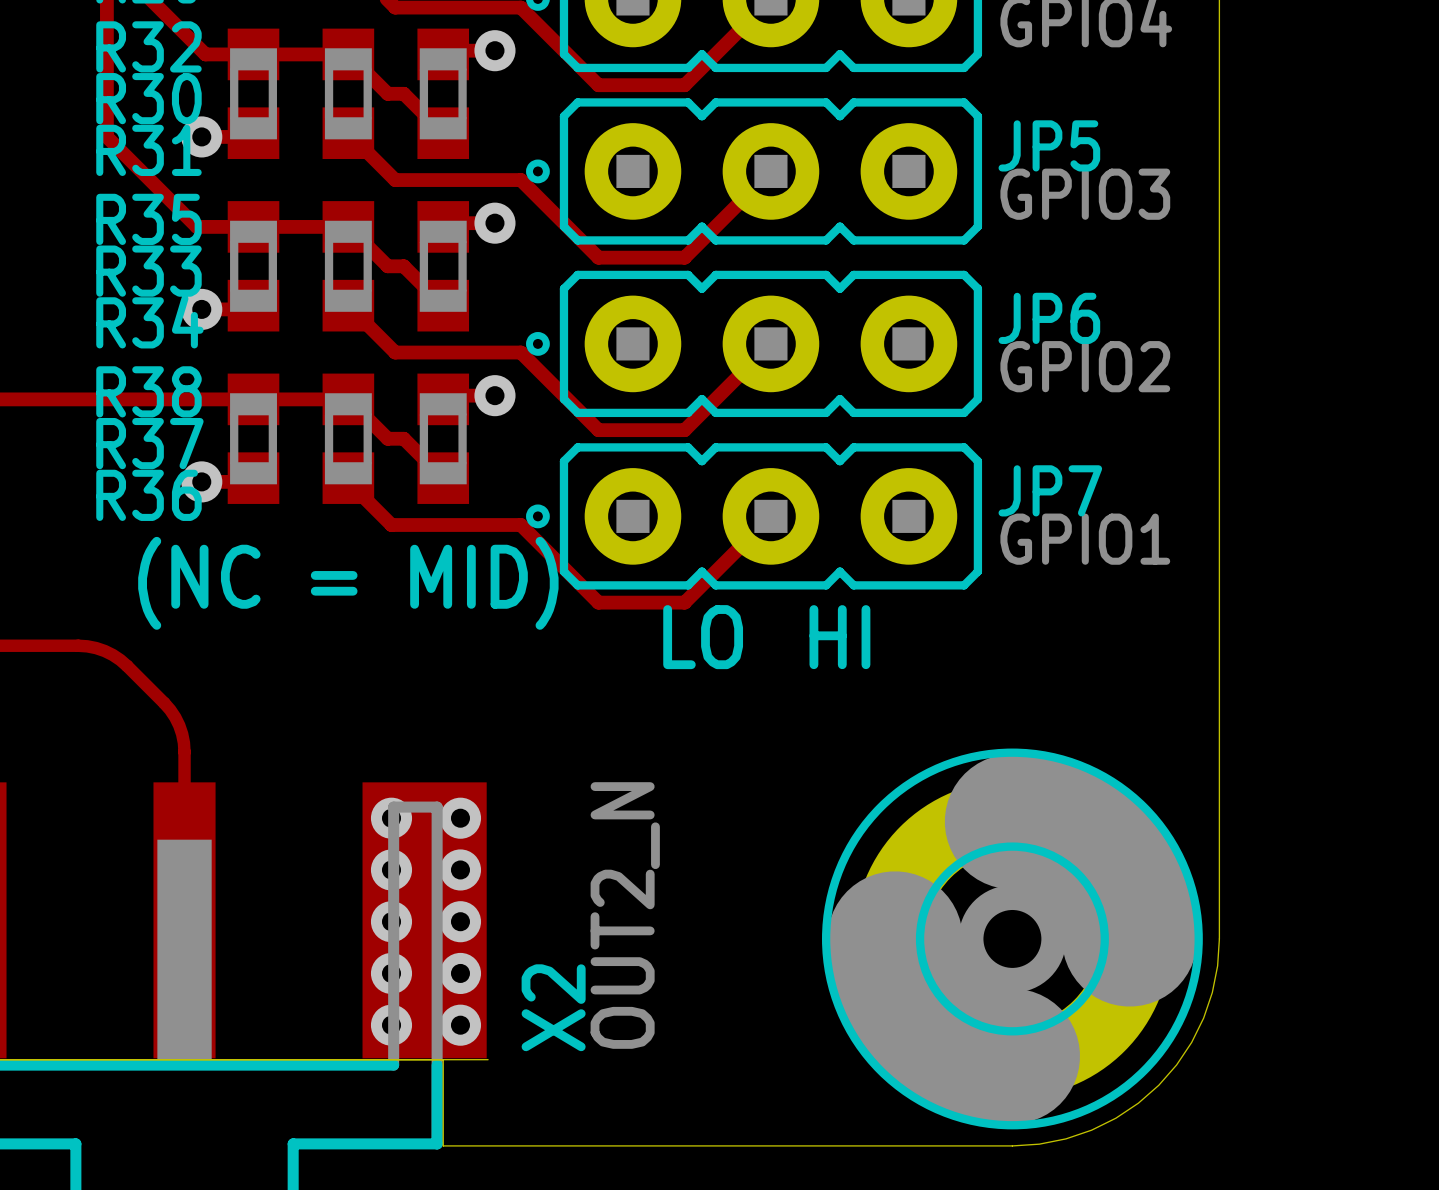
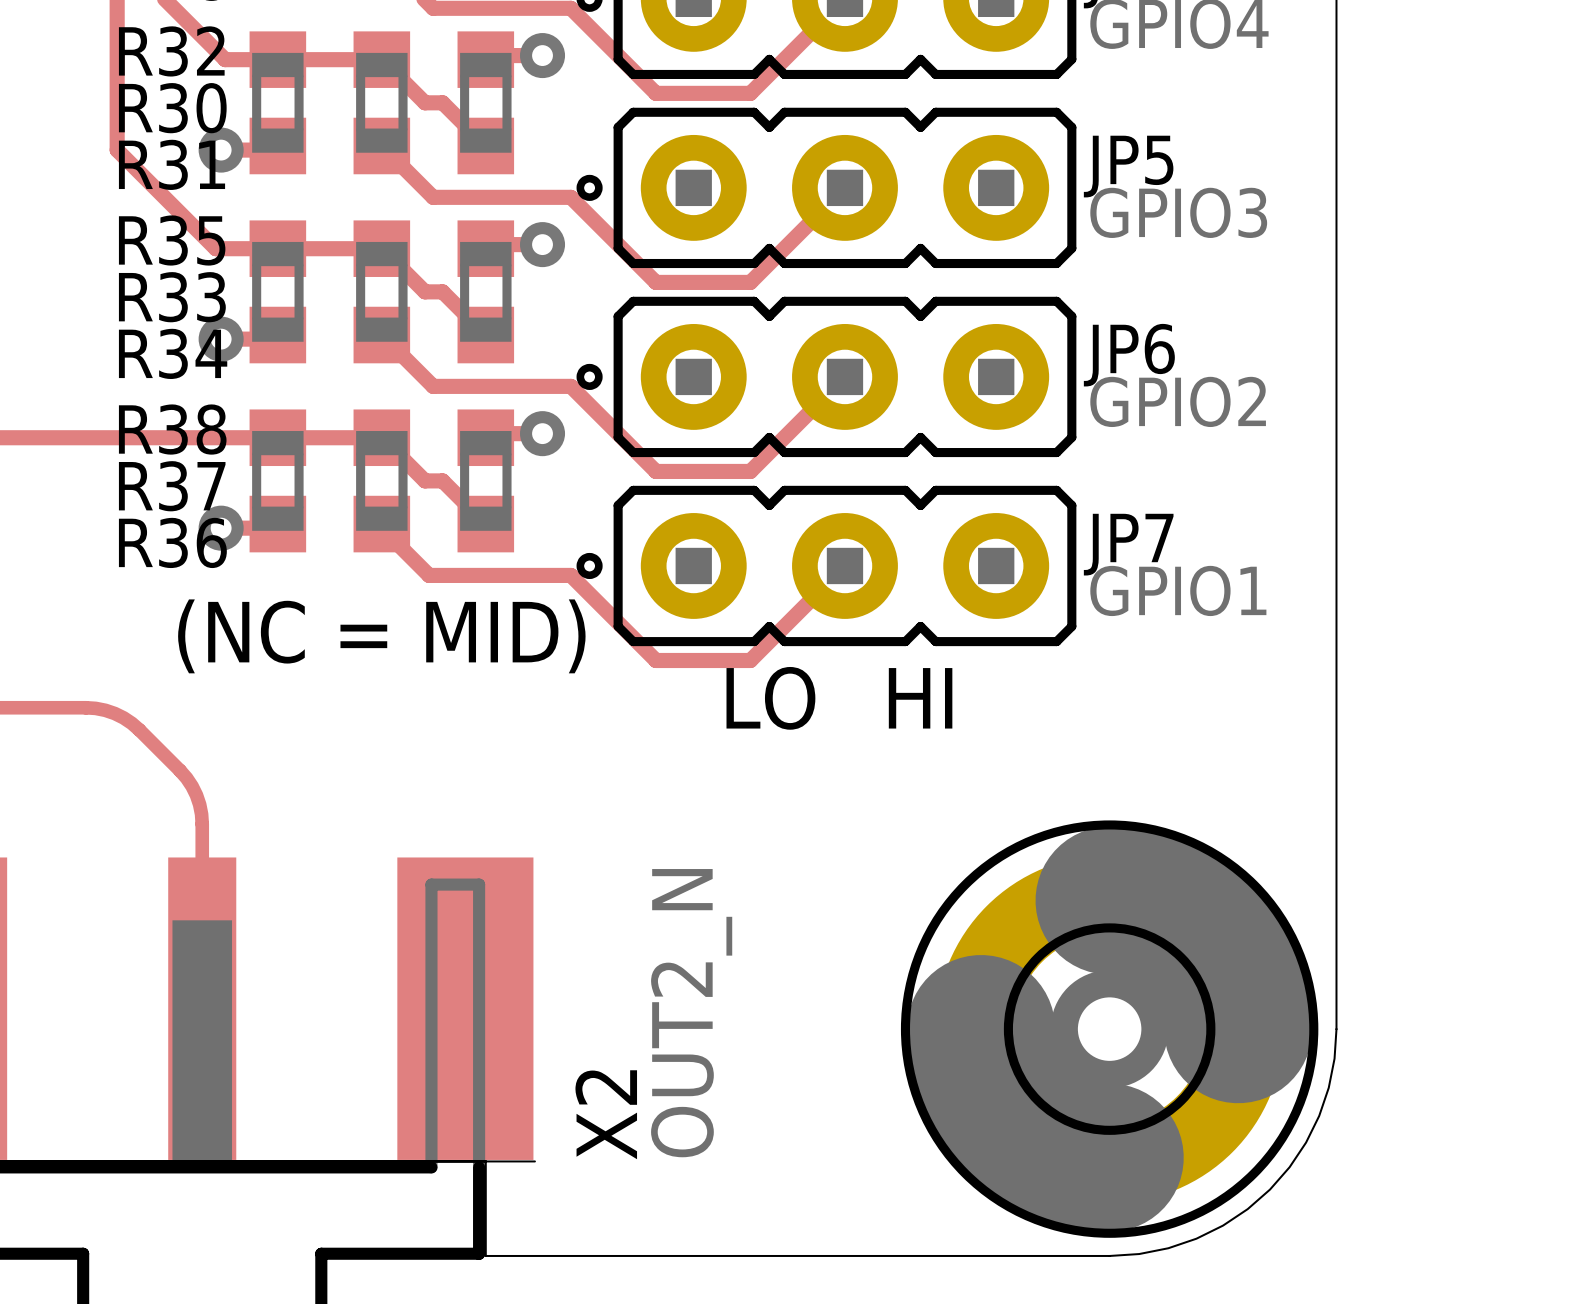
via: (391, 818) -> none
via: (460, 818) -> none
via: (391, 869) -> none
via: (460, 869) -> none
via: (391, 921) -> none
via: (460, 921) -> none
via: (391, 973) -> none
via: (460, 973) -> none
via: (391, 1025) -> none
via: (460, 1025) -> none

